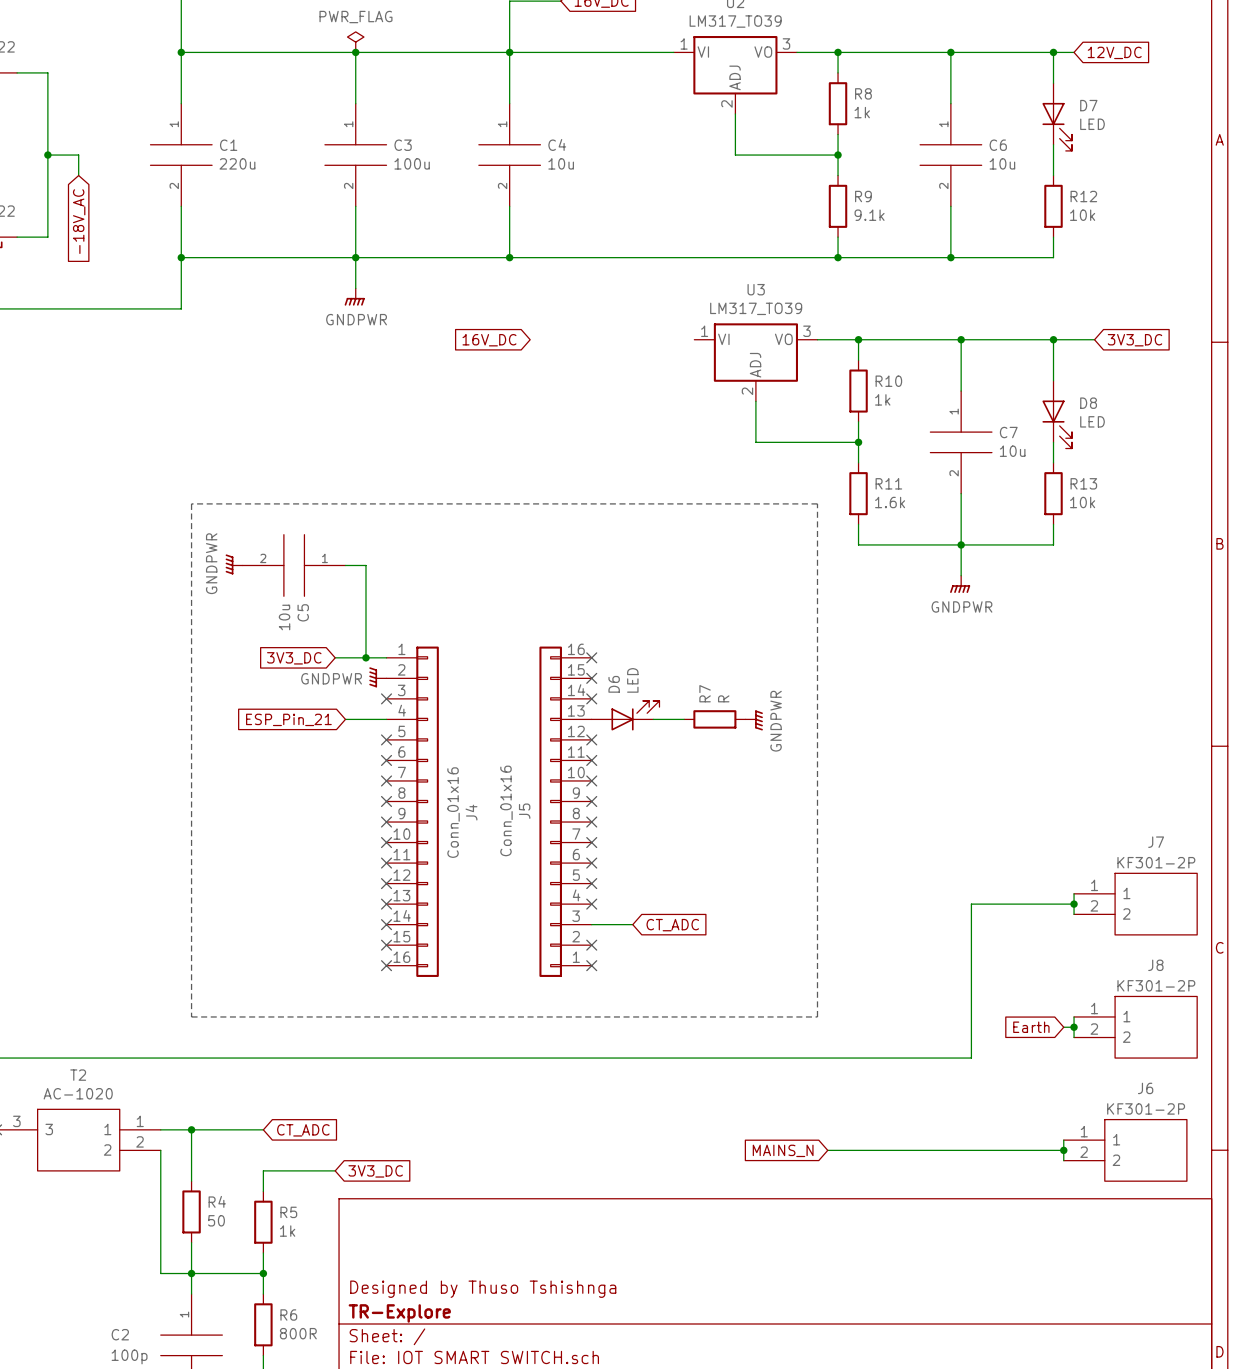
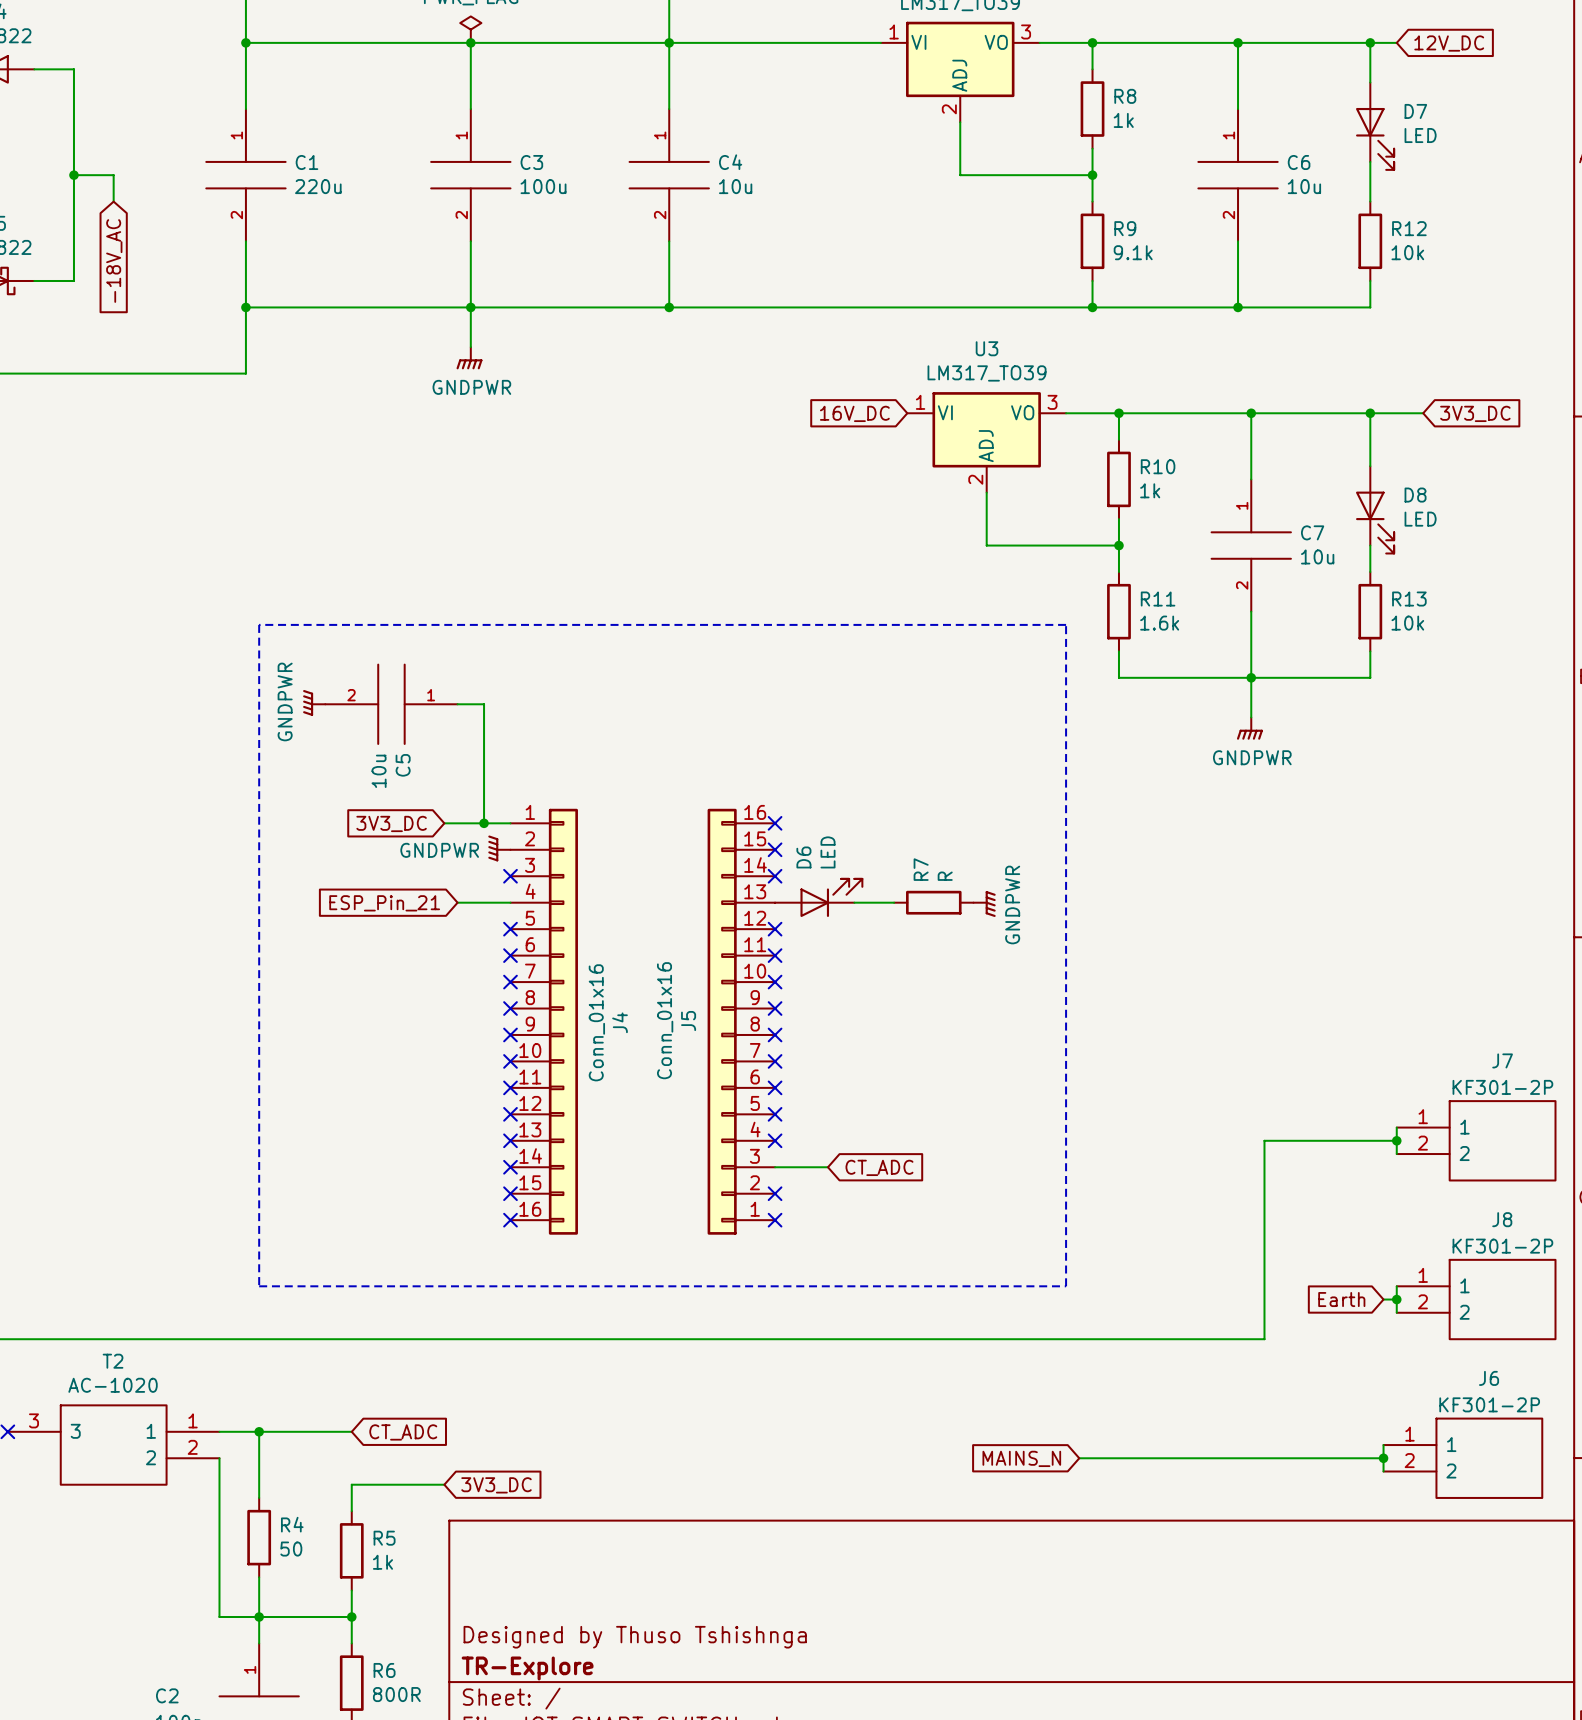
global label position: 16V_DC (489, 340) -> 16V_DC (854, 413)

